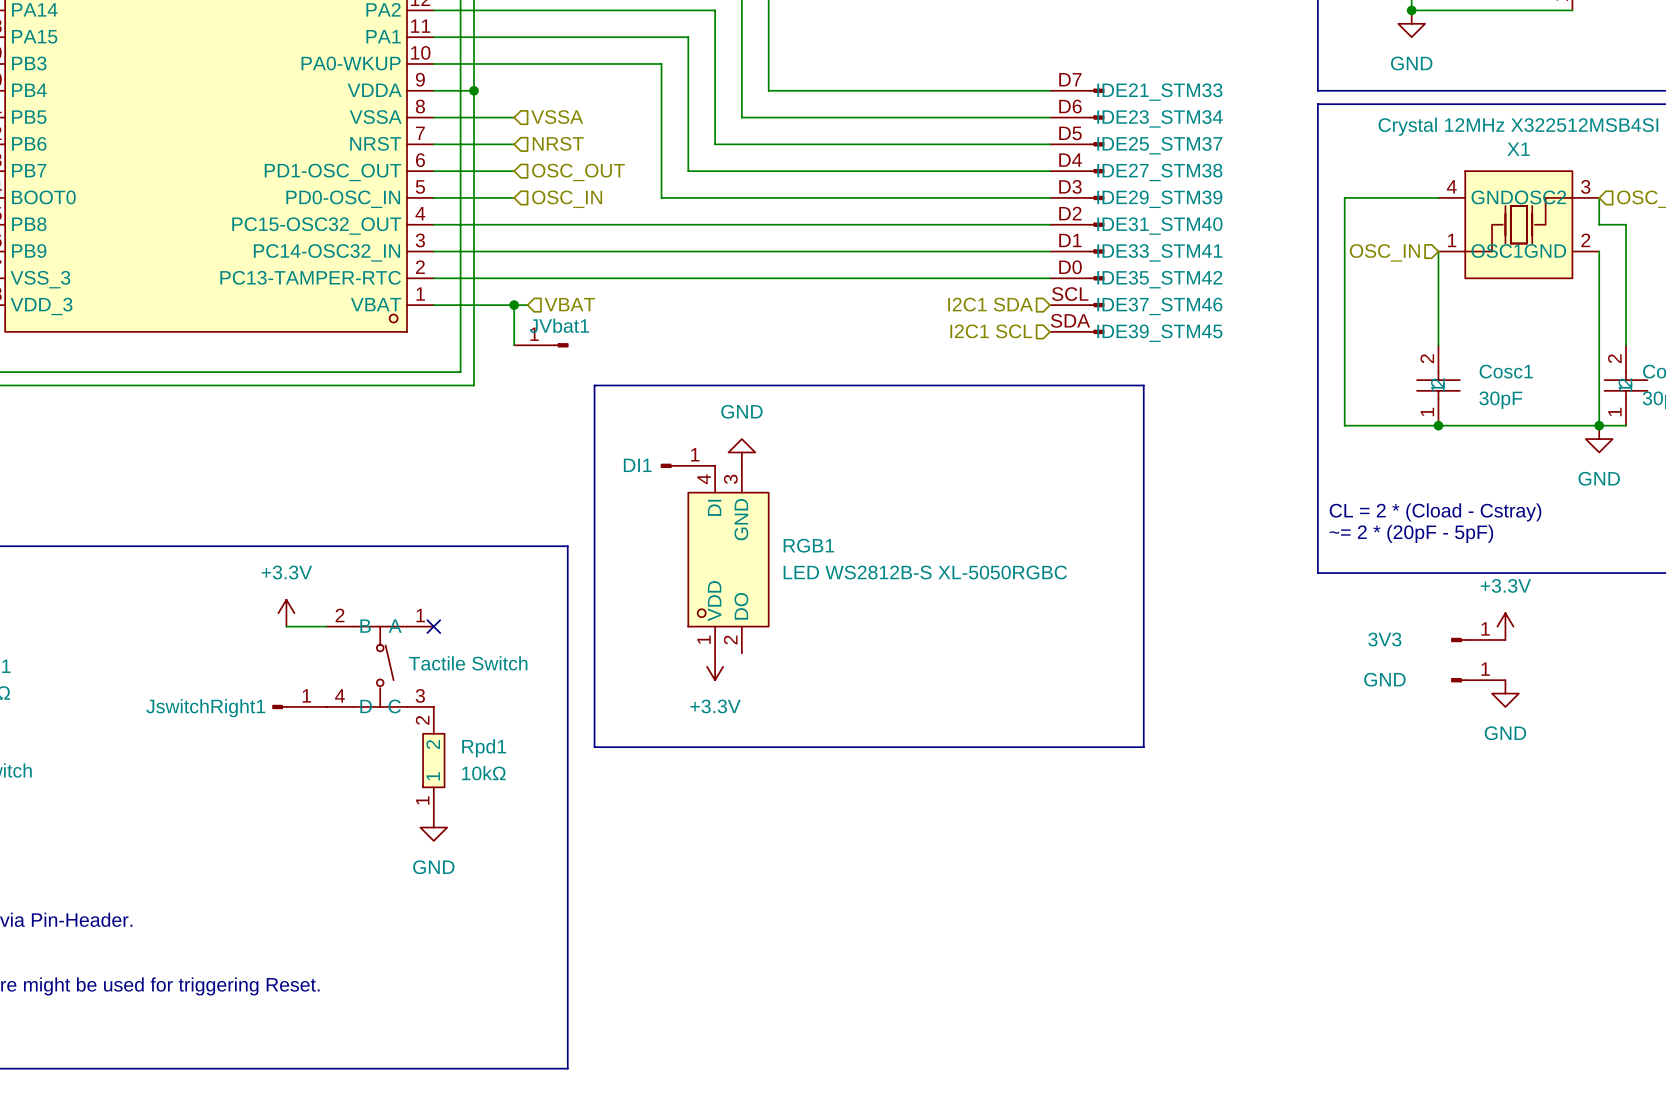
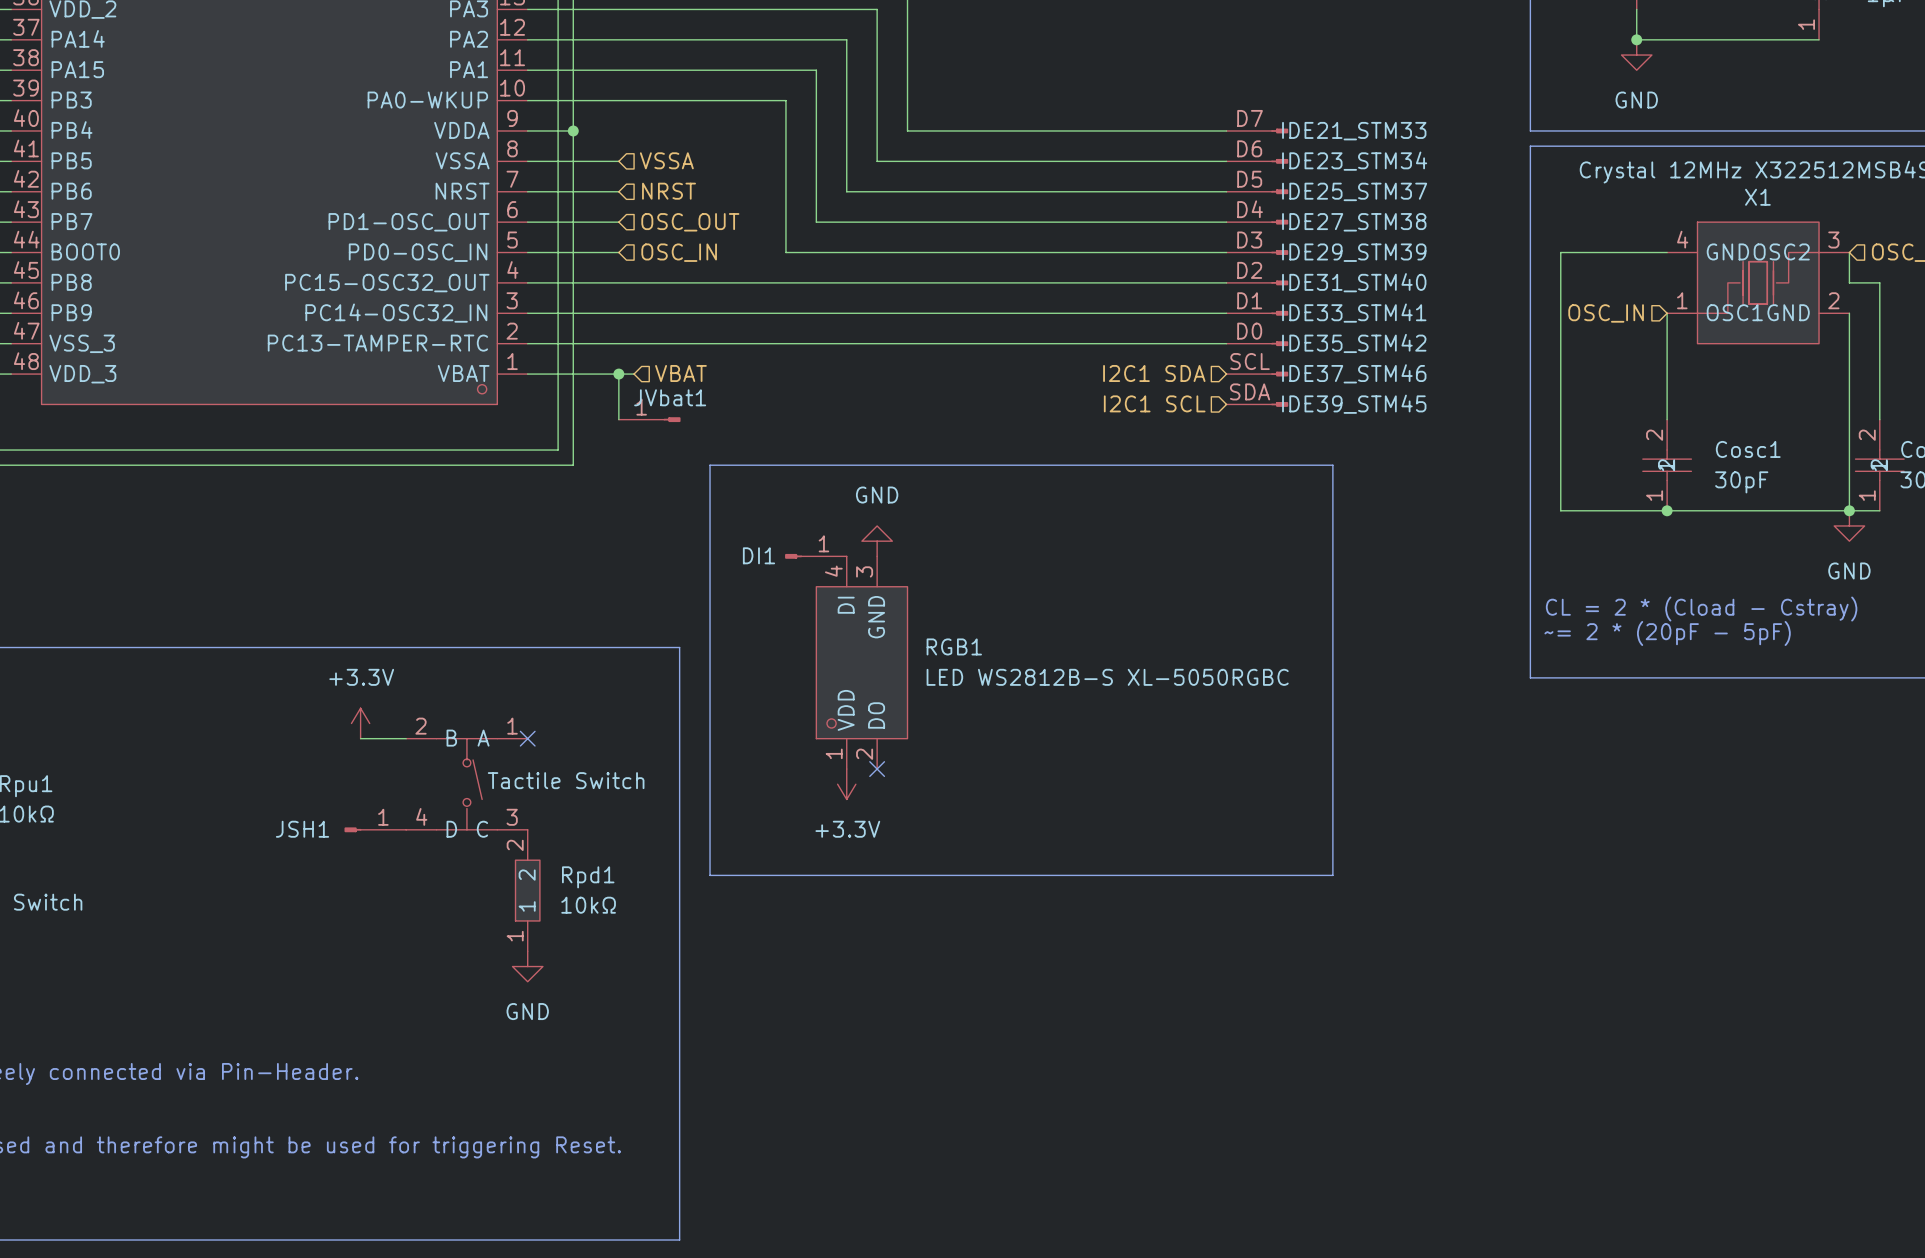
power symbol: +3.3V (1505, 626) -> none
3V3: (1478, 640) -> none
no-connect mark: none -> (877, 769)
GND: (1478, 680) -> none
power symbol: GND (1505, 693) -> none
JswitchRight1 name: JswitchRight1 (205, 708) -> JSH1 (302, 829)

